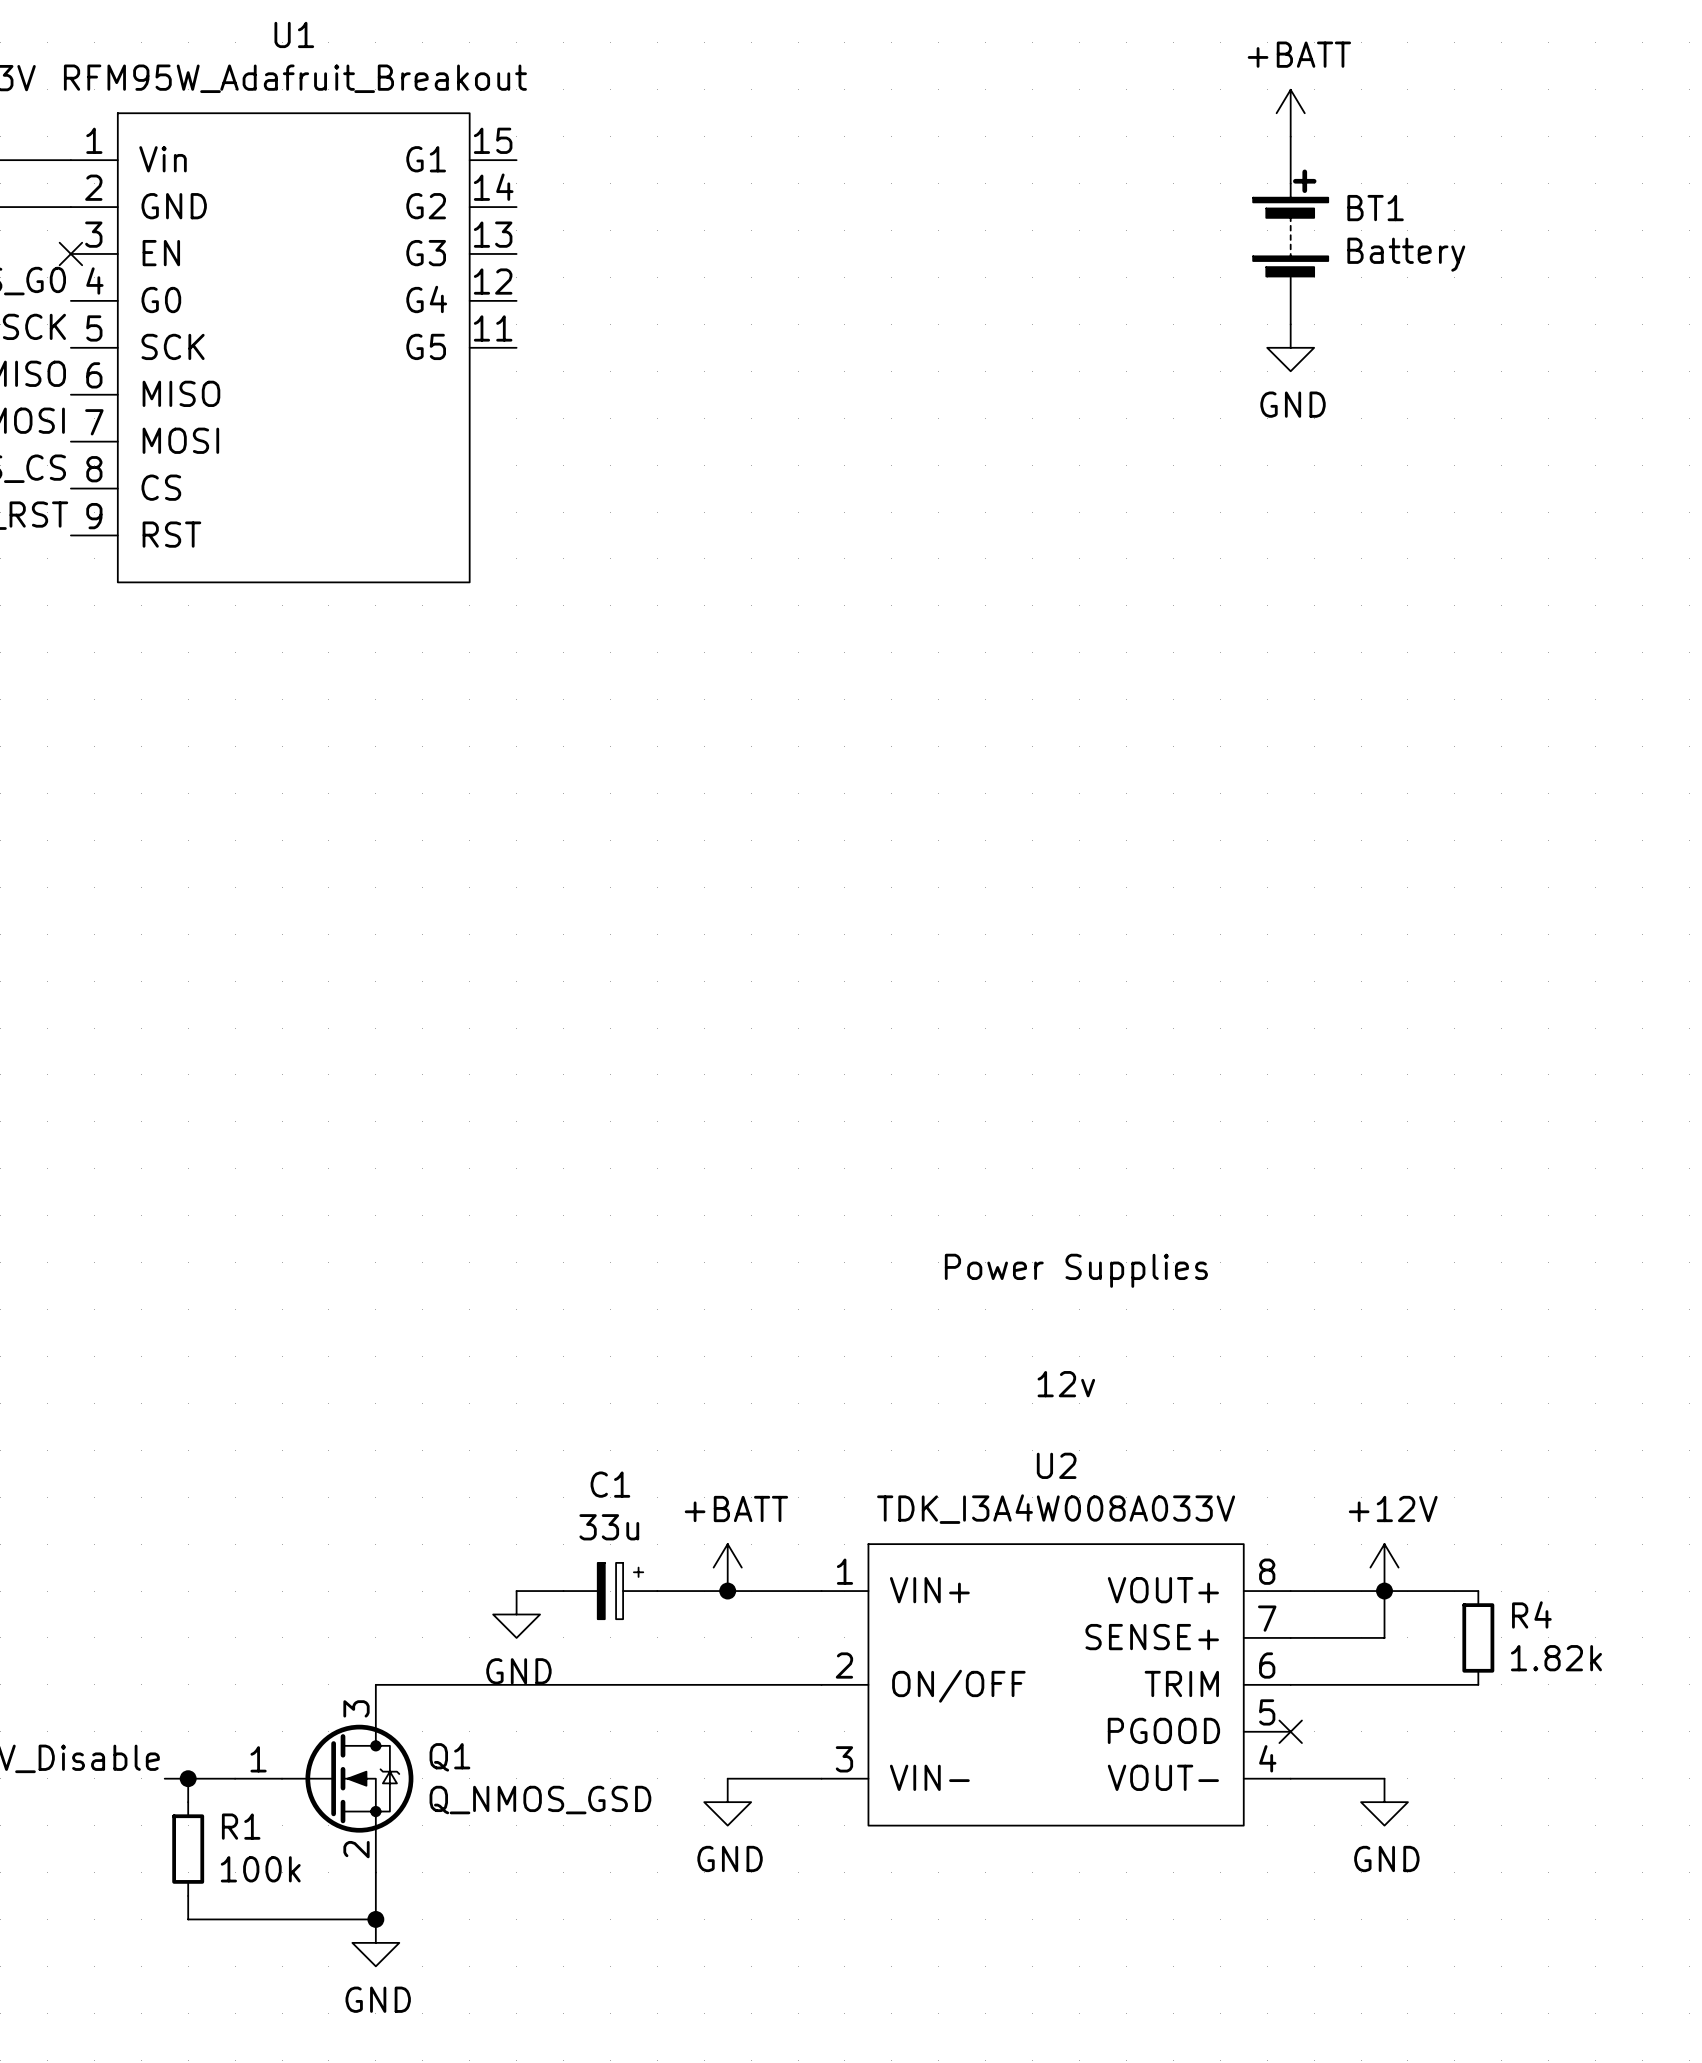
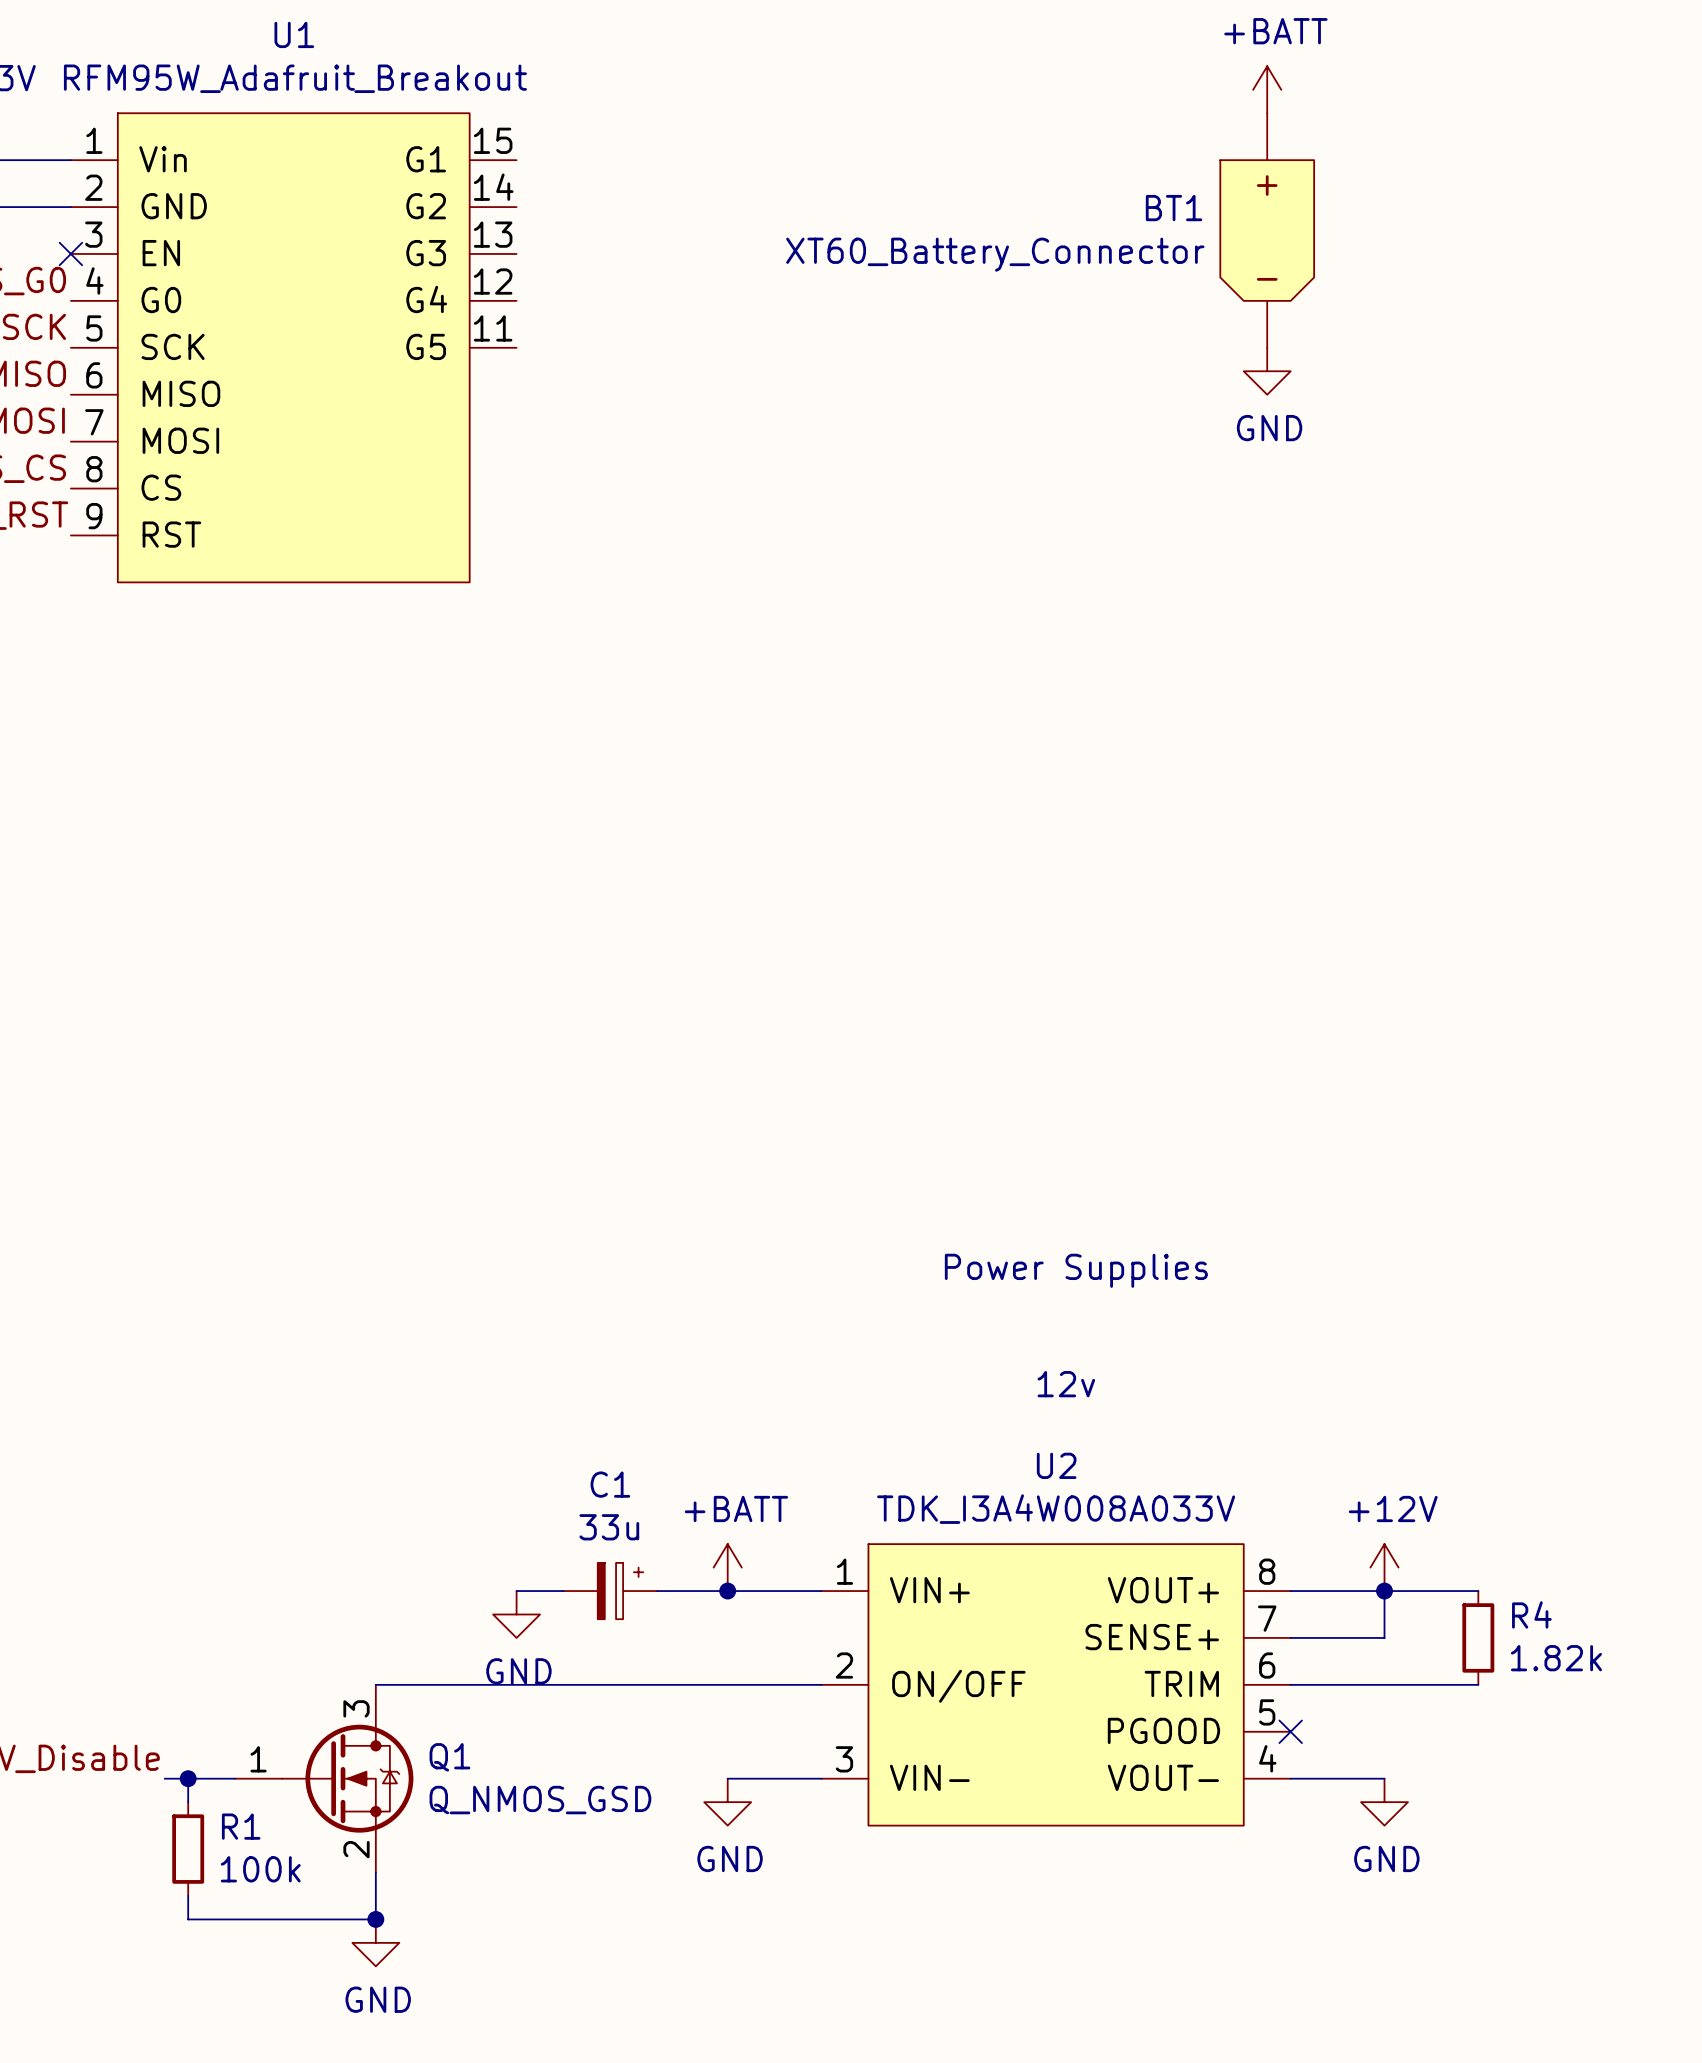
power symbol position: +BATT (1290, 113) -> +BATT (1267, 89)
BT1 symbol: [1253, 136, 1329, 325] -> [1220, 113, 1315, 348]
BT1 name position: BT1 (1375, 208) -> BT1 (1174, 208)
BT1 value: Battery (1406, 254) -> XT60_Battery_Connector (995, 254)
power symbol position: GND (1290, 347) -> GND (1267, 371)

